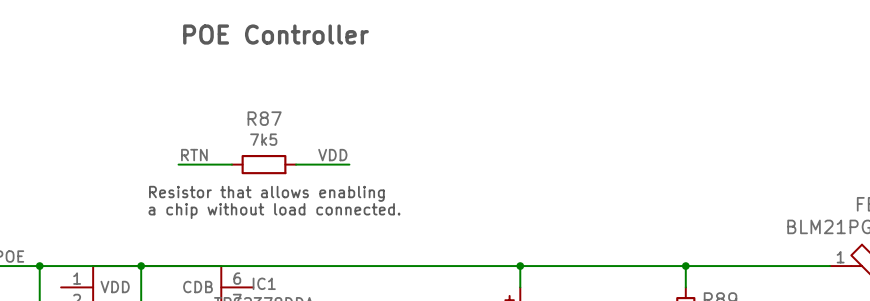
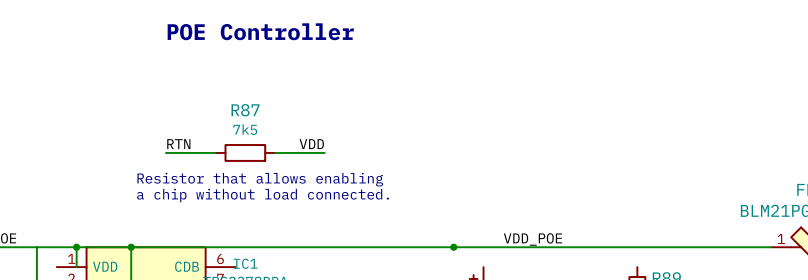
label: none -> VDD_POE (532, 239)
junction position: (39, 266) -> (76, 247)
wire: none -> (76, 247) (76, 267)
wire: (520, 266) (520, 287) -> none
junction position: (520, 266) -> (453, 247)
wire: (685, 266) (685, 287) -> none
junction: (685, 266) -> none

